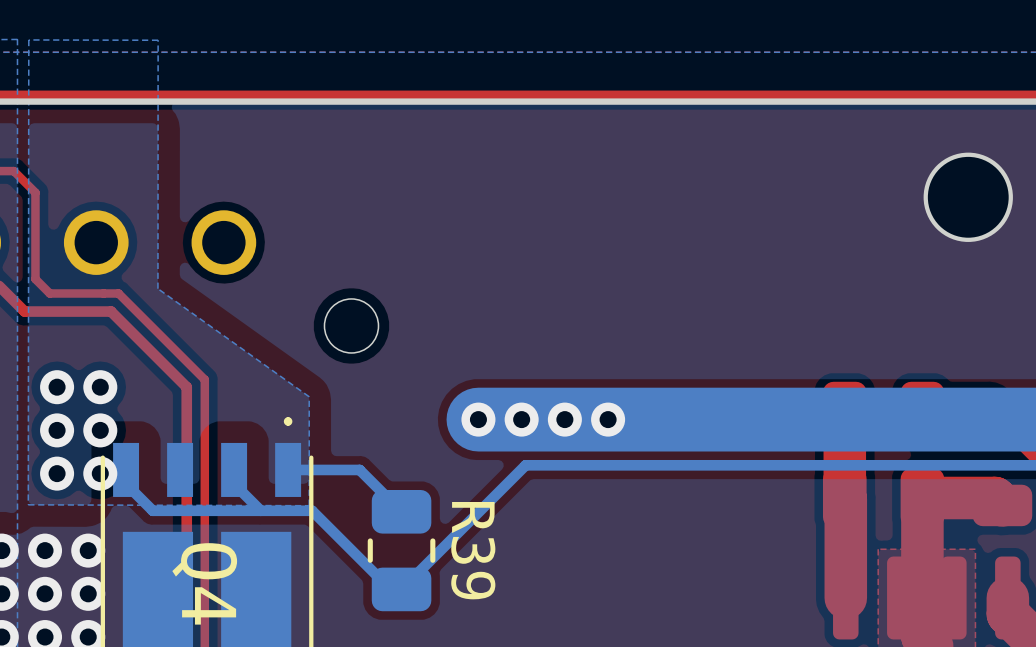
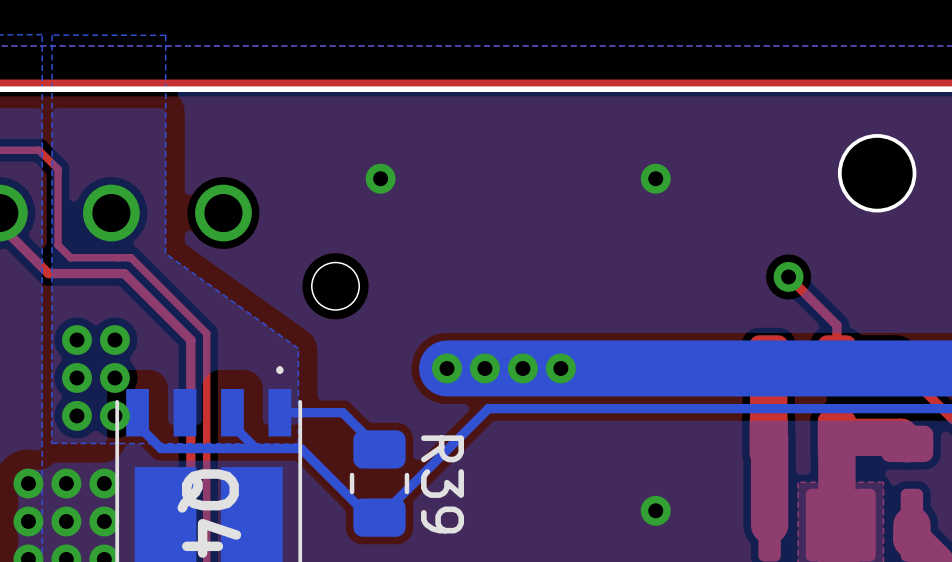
via: none -> (380, 178)
via: none -> (655, 178)
top track: none -> (788, 276) (836, 325) (836, 361)
via: none -> (788, 276)
via: none -> (655, 510)

